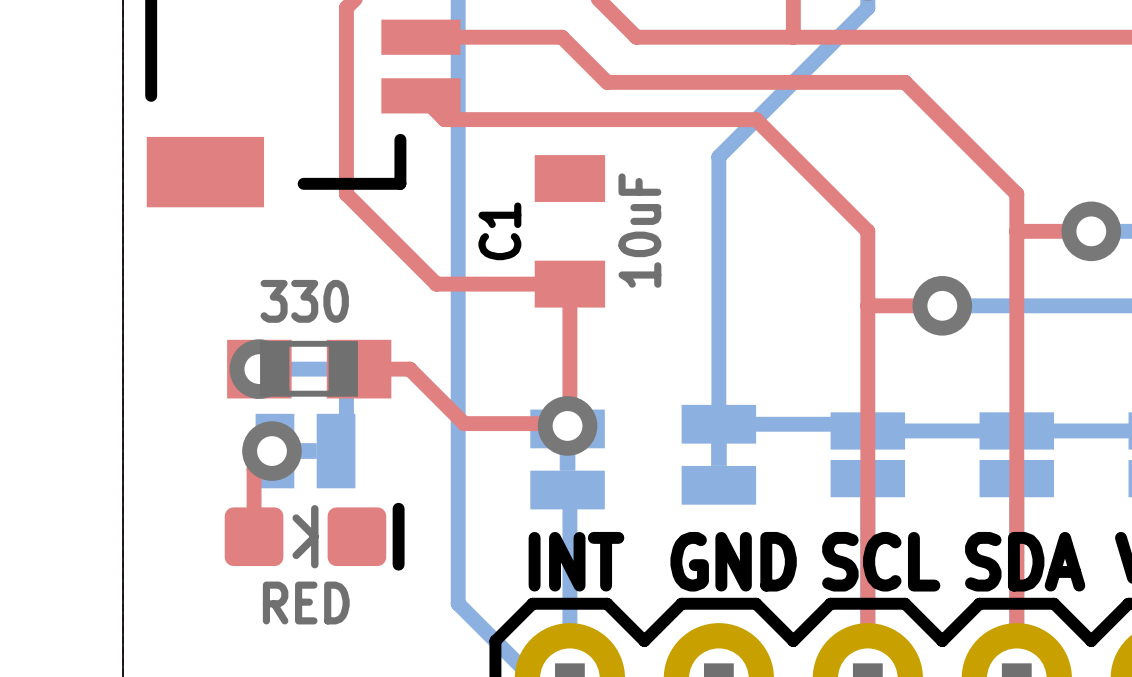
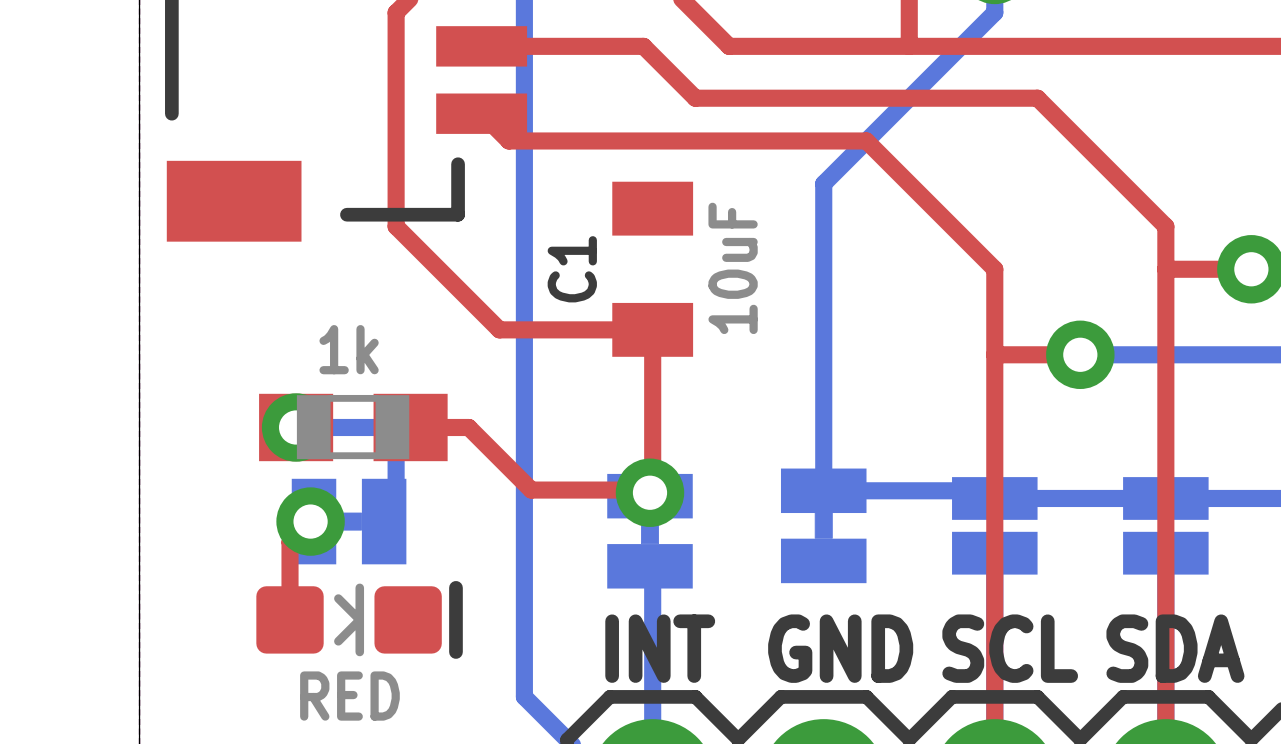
part value: 330 (304, 301) -> 1k (349, 349)

